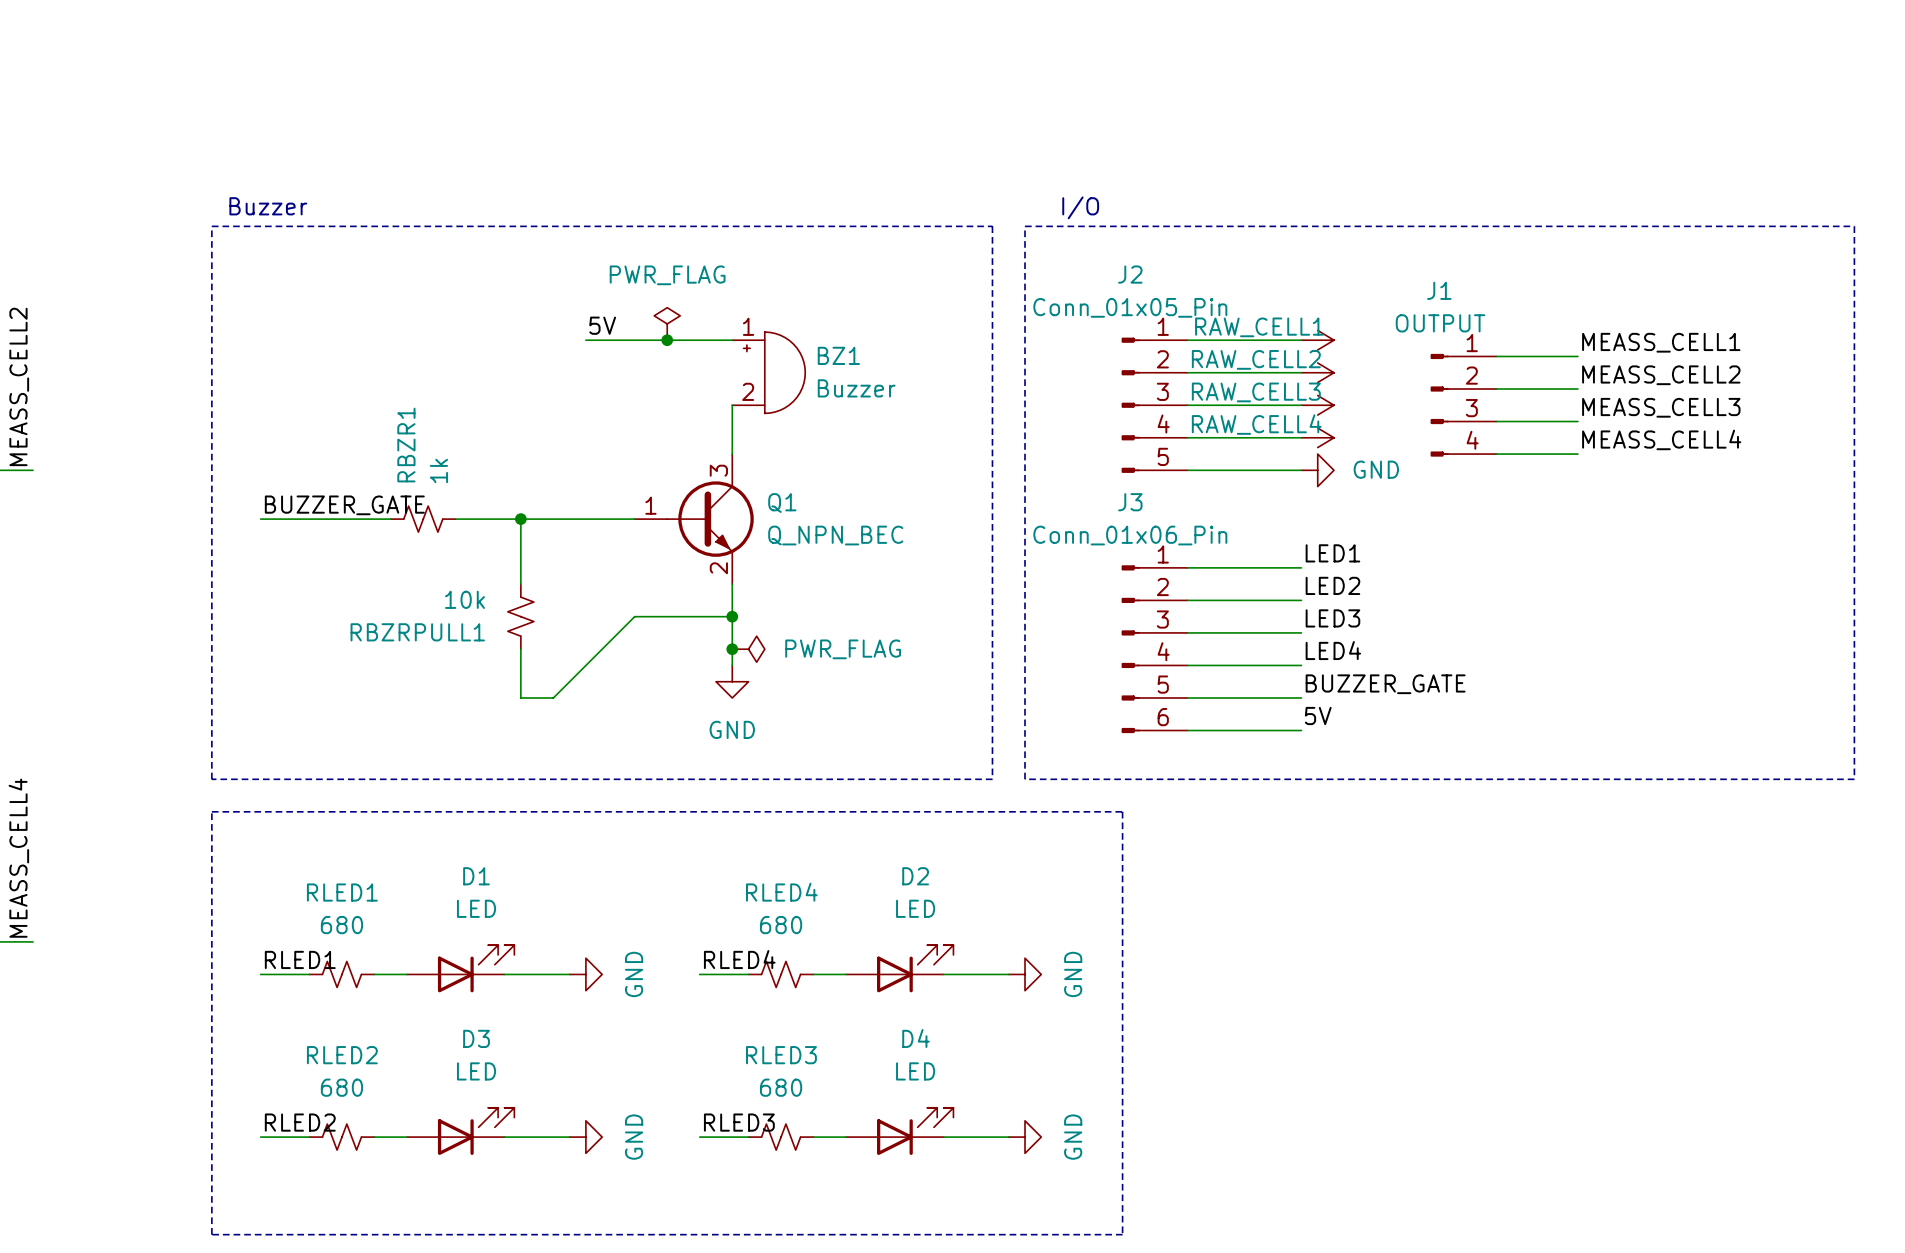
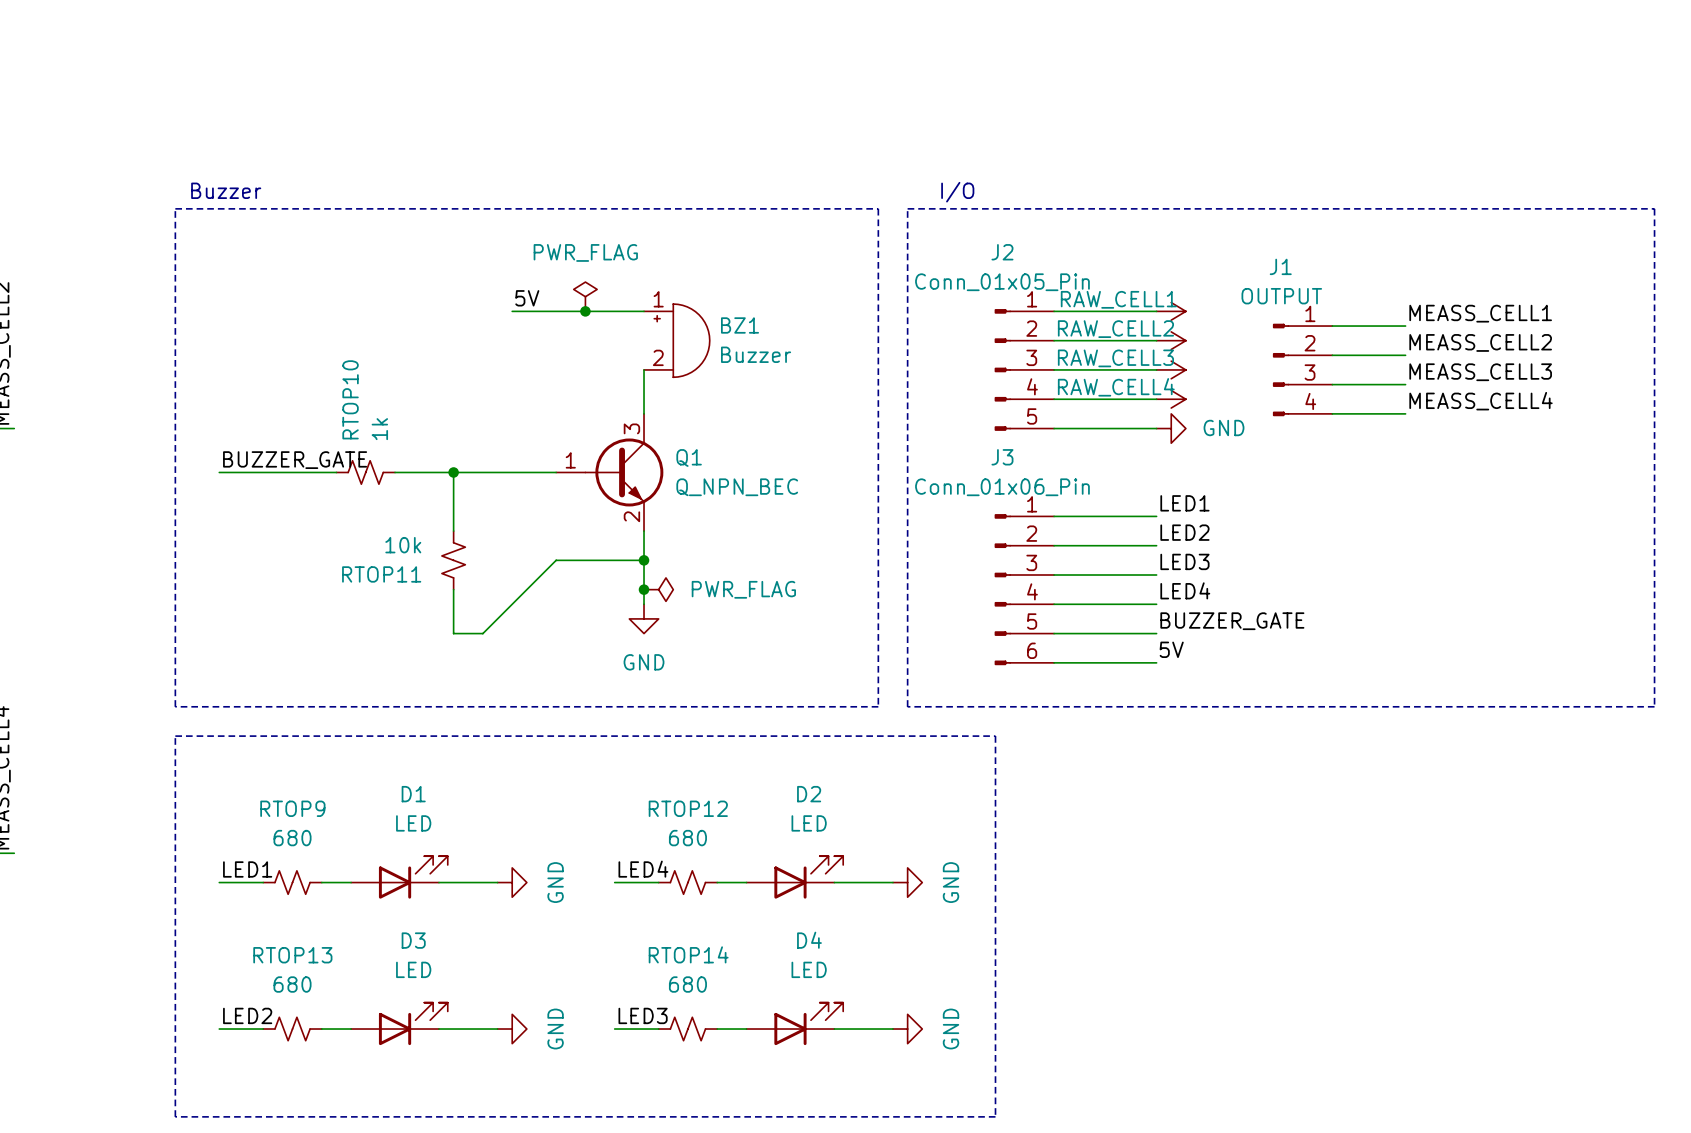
RBZR1 name: RBZR1 (406, 445) -> RTOP10 (350, 399)
RBZRPULL1 name: RBZRPULL1 (417, 632) -> RTOP11 (381, 574)
RLED1 name: RLED1 (342, 892) -> RTOP9 (292, 808)
RLED4 name: RLED4 (781, 892) -> RTOP12 (688, 808)
label: RLED1 (300, 959) -> LED1 (247, 869)
label: RLED4 (739, 959) -> LED4 (643, 869)
RLED2 name: RLED2 (342, 1055) -> RTOP13 (292, 955)
RLED3 name: RLED3 (781, 1055) -> RTOP14 (688, 954)
label: RLED2 (300, 1122) -> LED2 (247, 1015)
label: RLED3 (739, 1122) -> LED3 (643, 1015)

